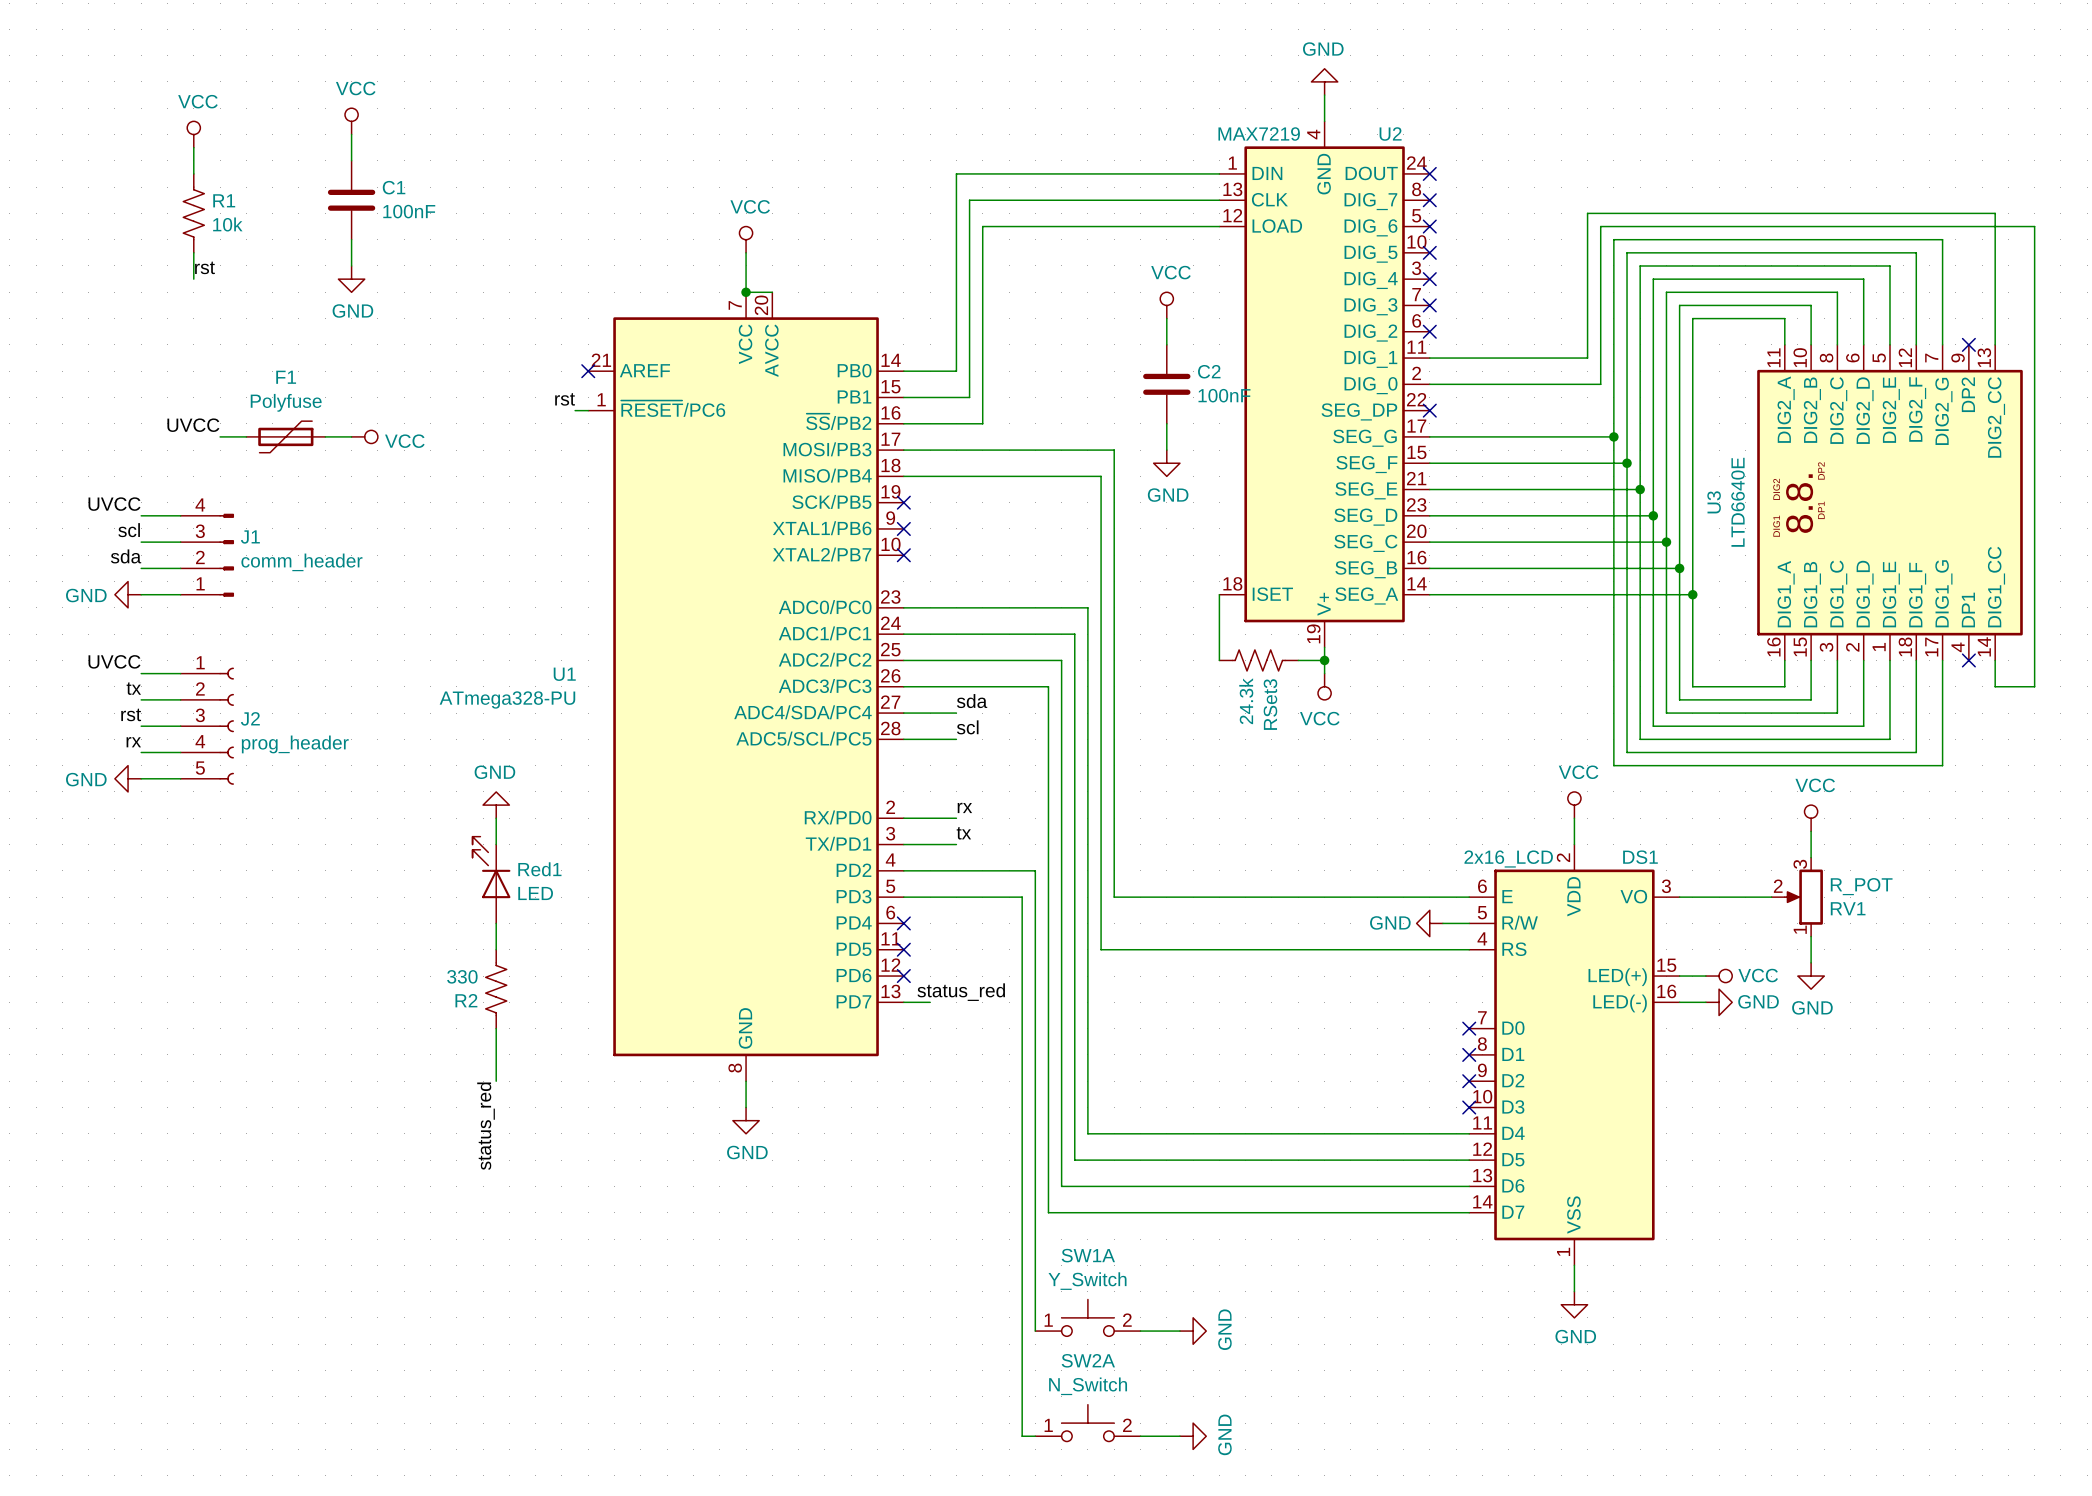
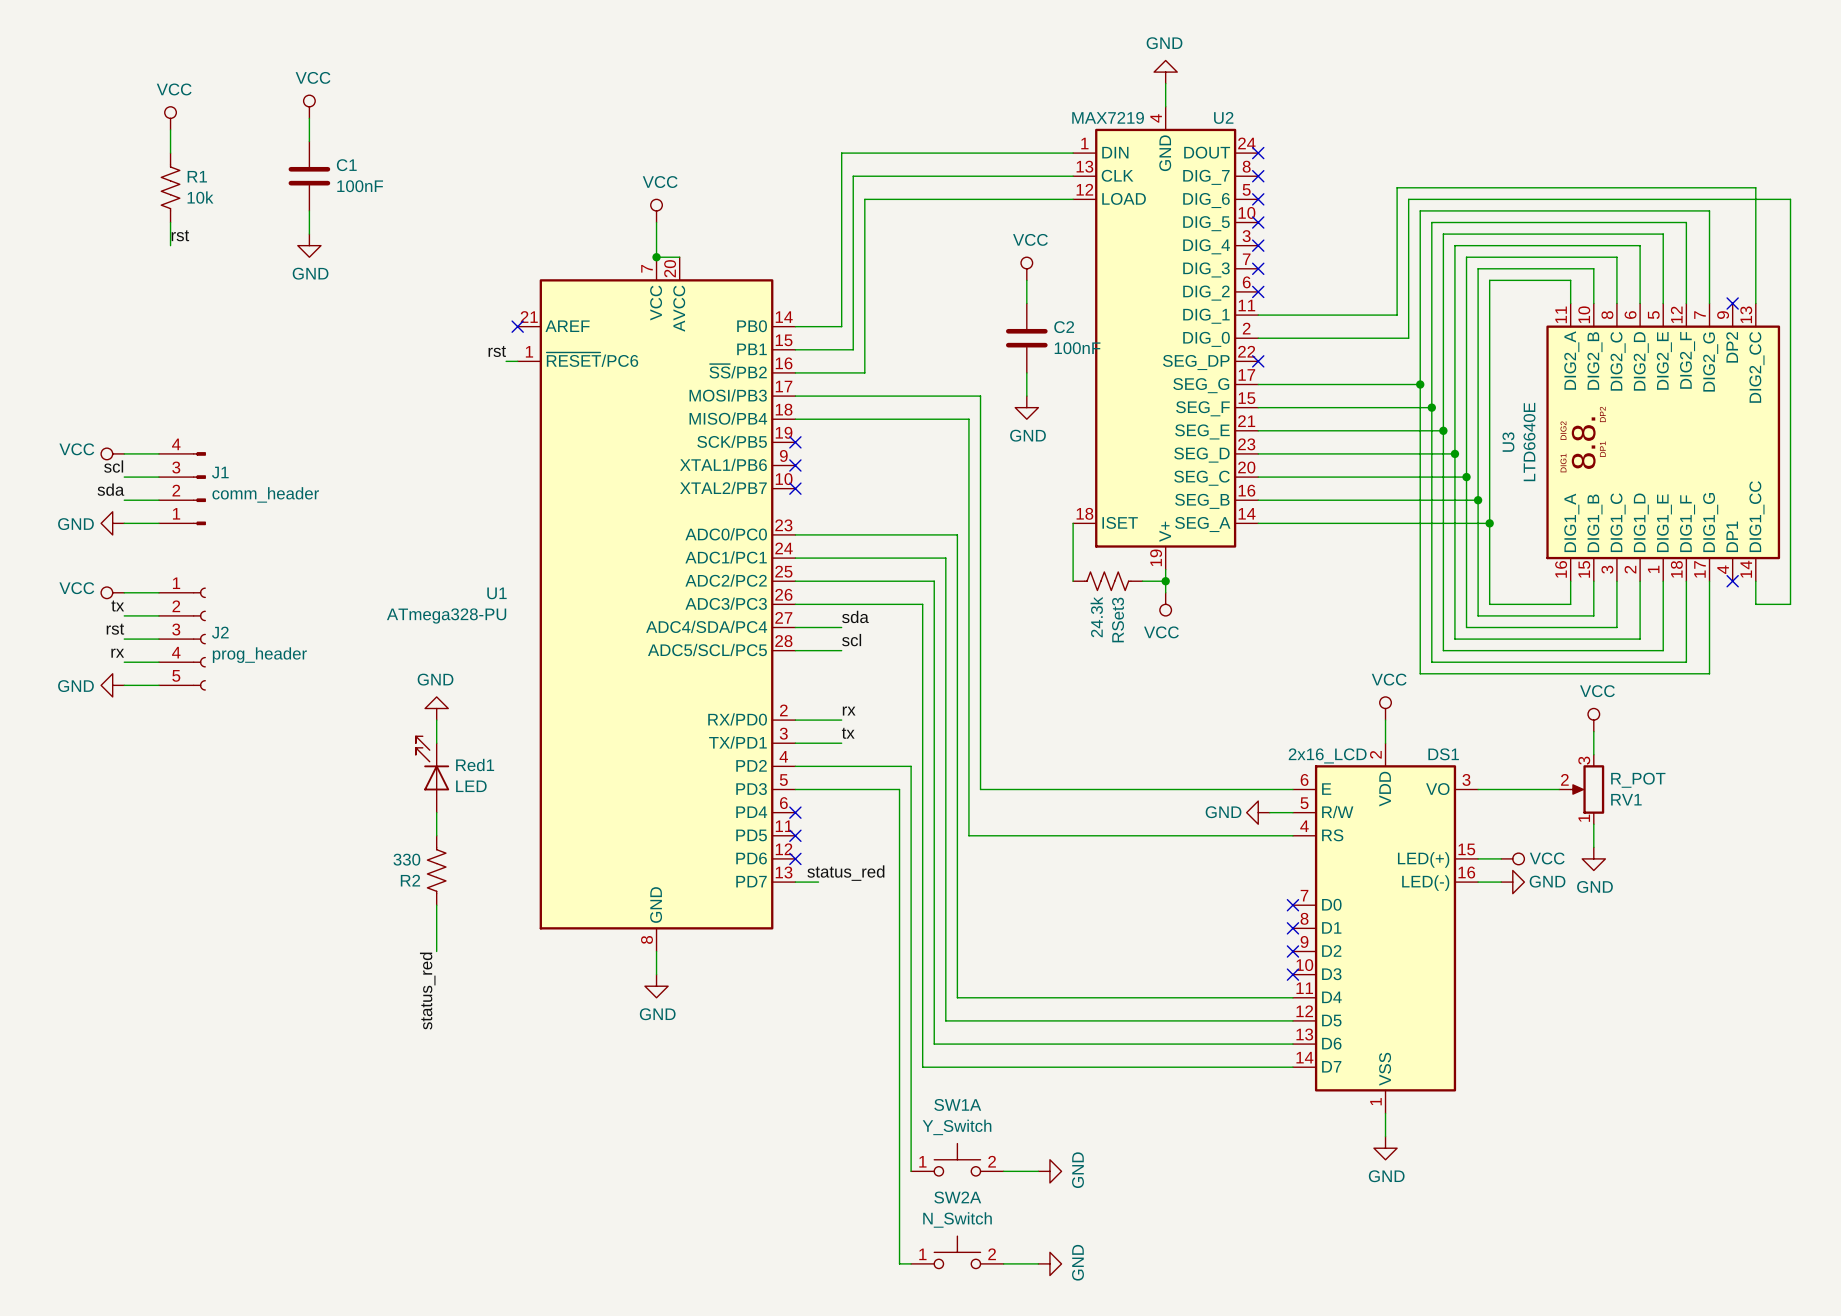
label: UVCC (193, 425) -> none
wire: (220, 436) (246, 436) -> none
F1: Polyfuse (285, 436) -> none
wire: (325, 436) (351, 436) -> none
power symbol: VCC (364, 436) -> none
label: UVCC (114, 504) -> none
power symbol: none -> VCC (112, 453)
label: UVCC (114, 661) -> none
power symbol: none -> VCC (112, 592)

